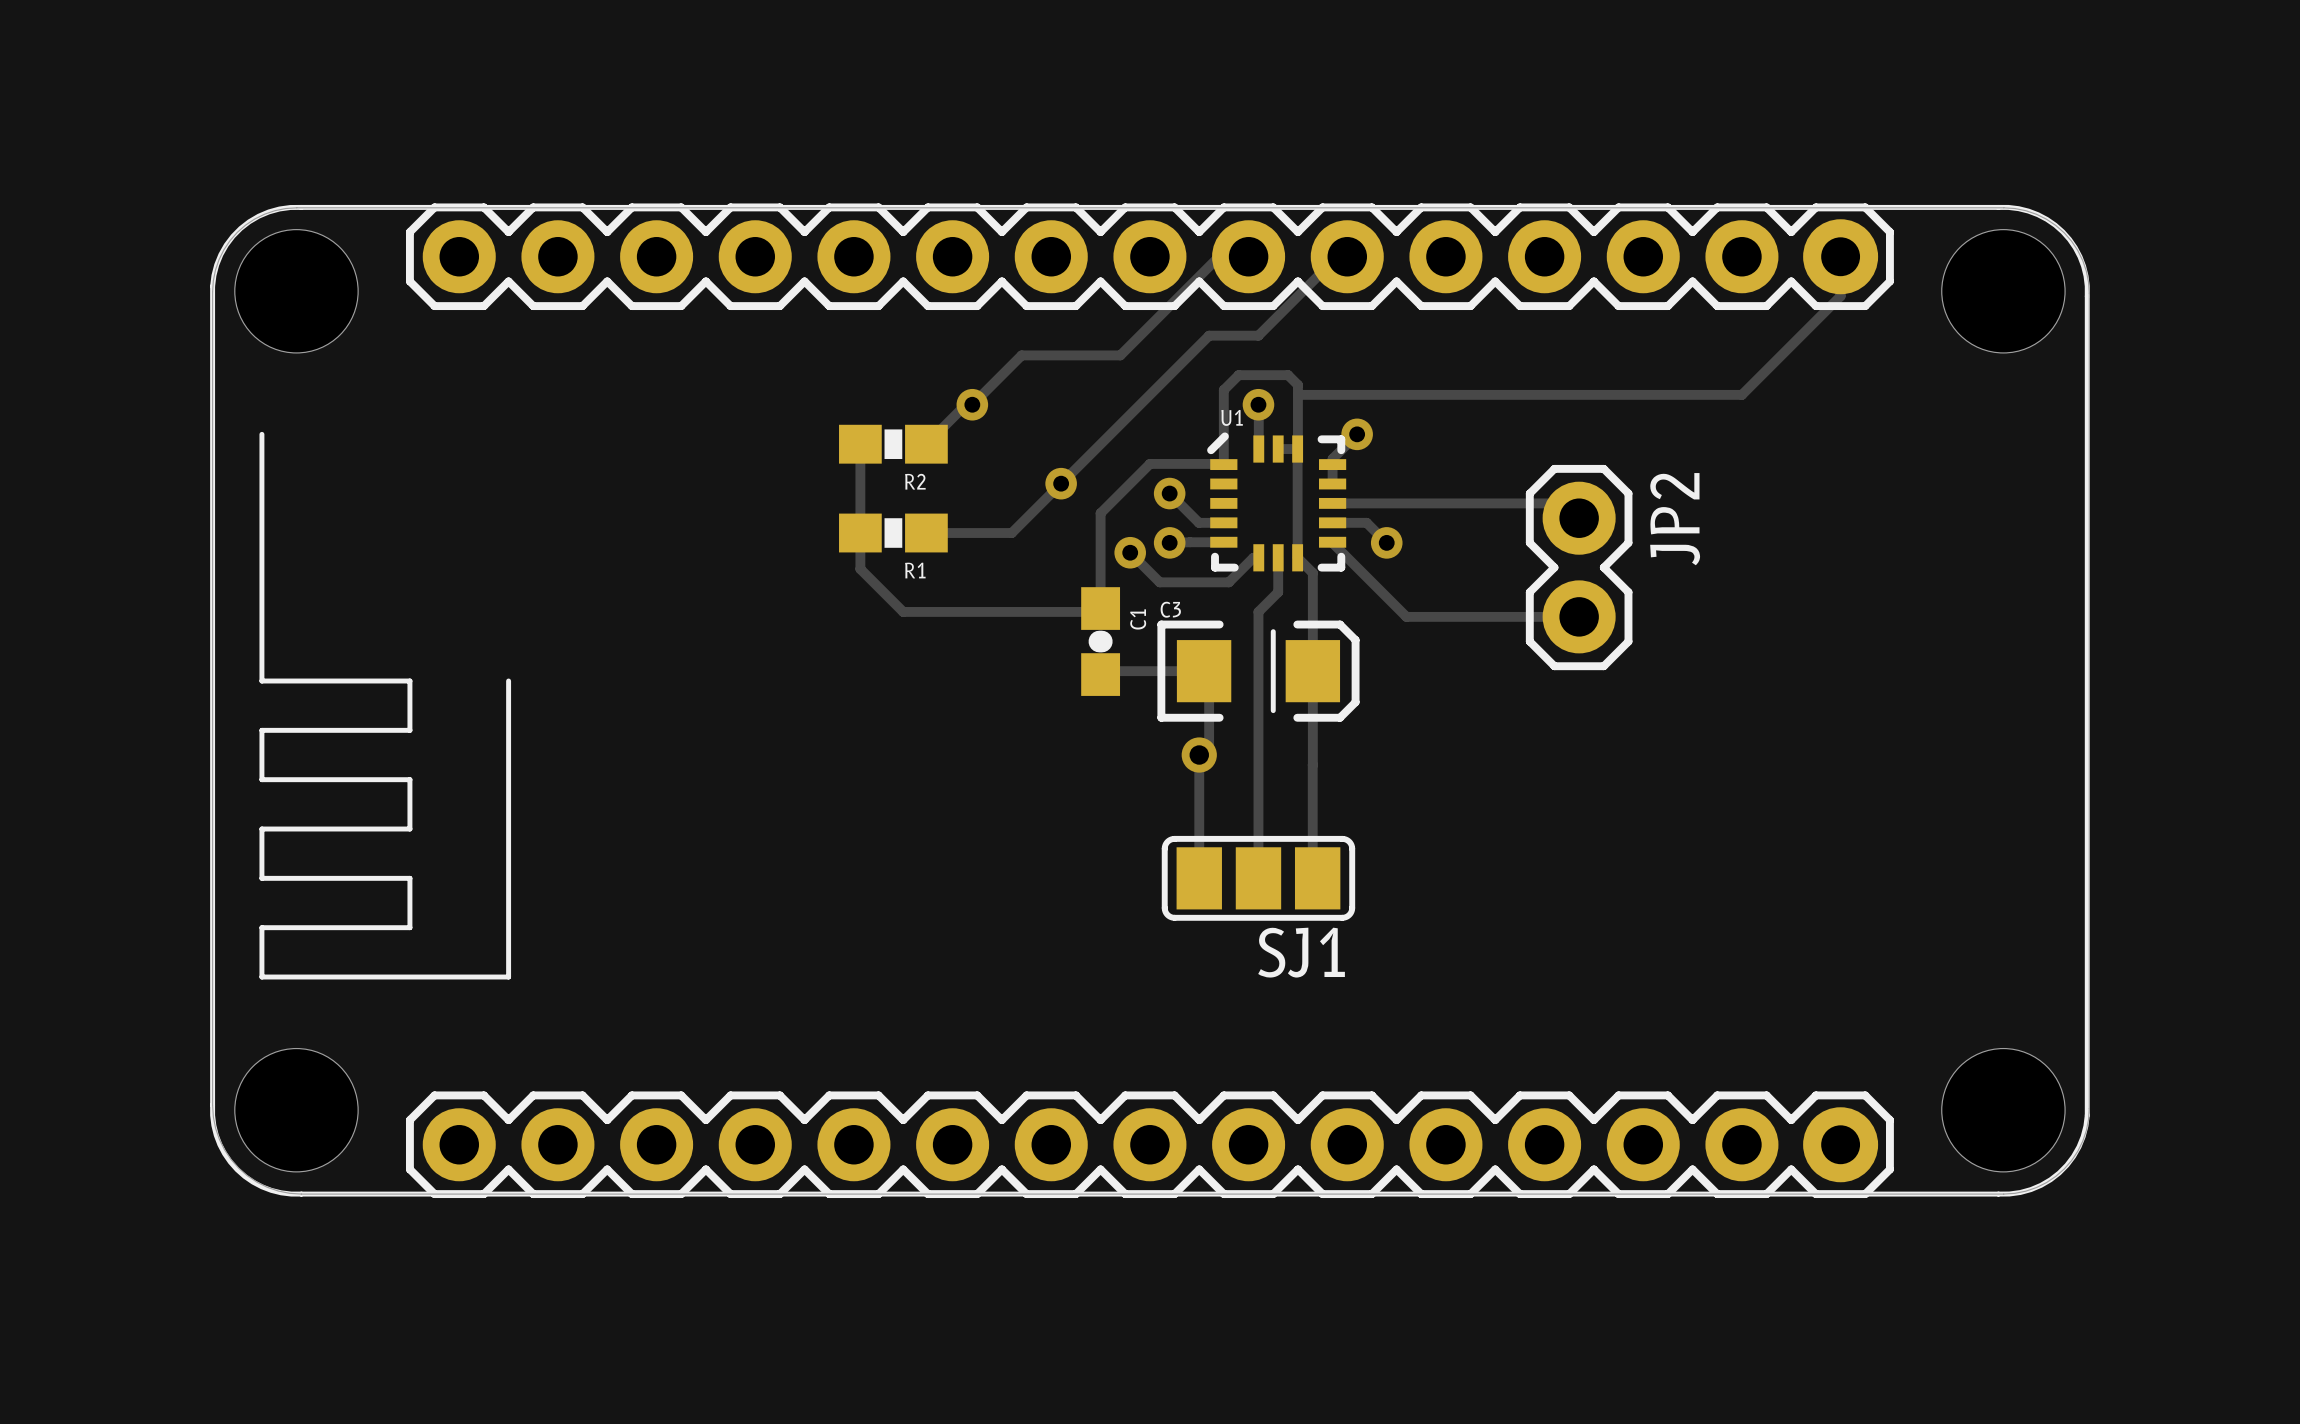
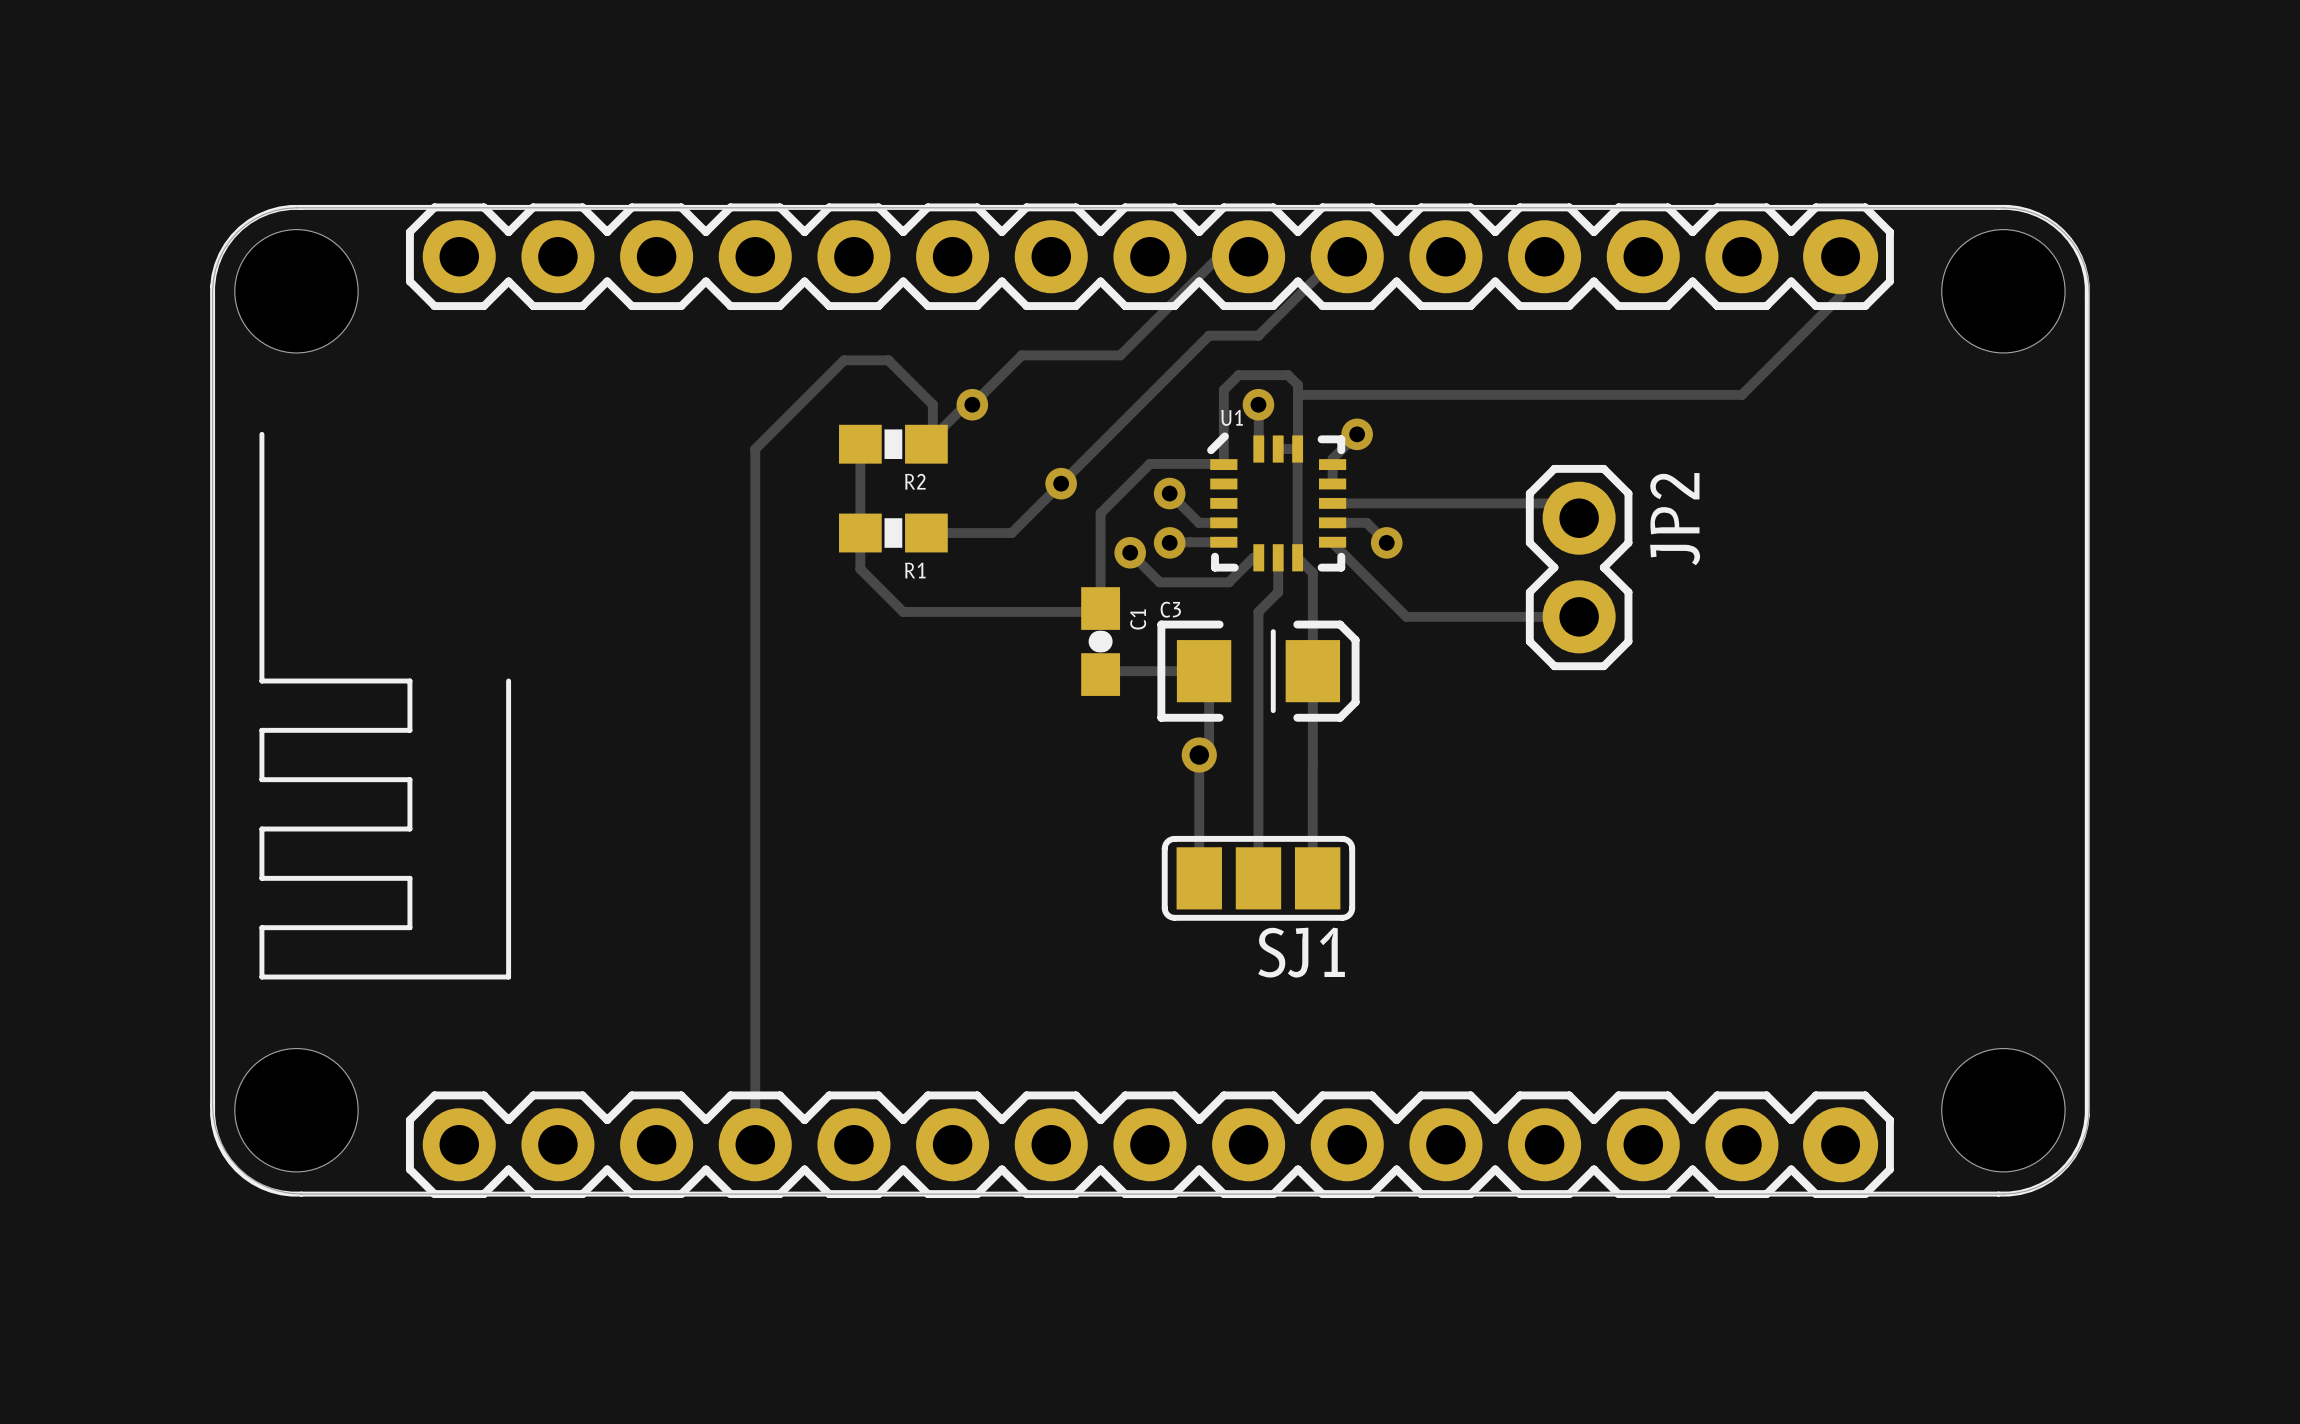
track: none -> (934, 436) (932, 434) (932, 404) (888, 360) (844, 360) (755, 449) (755, 1144)

